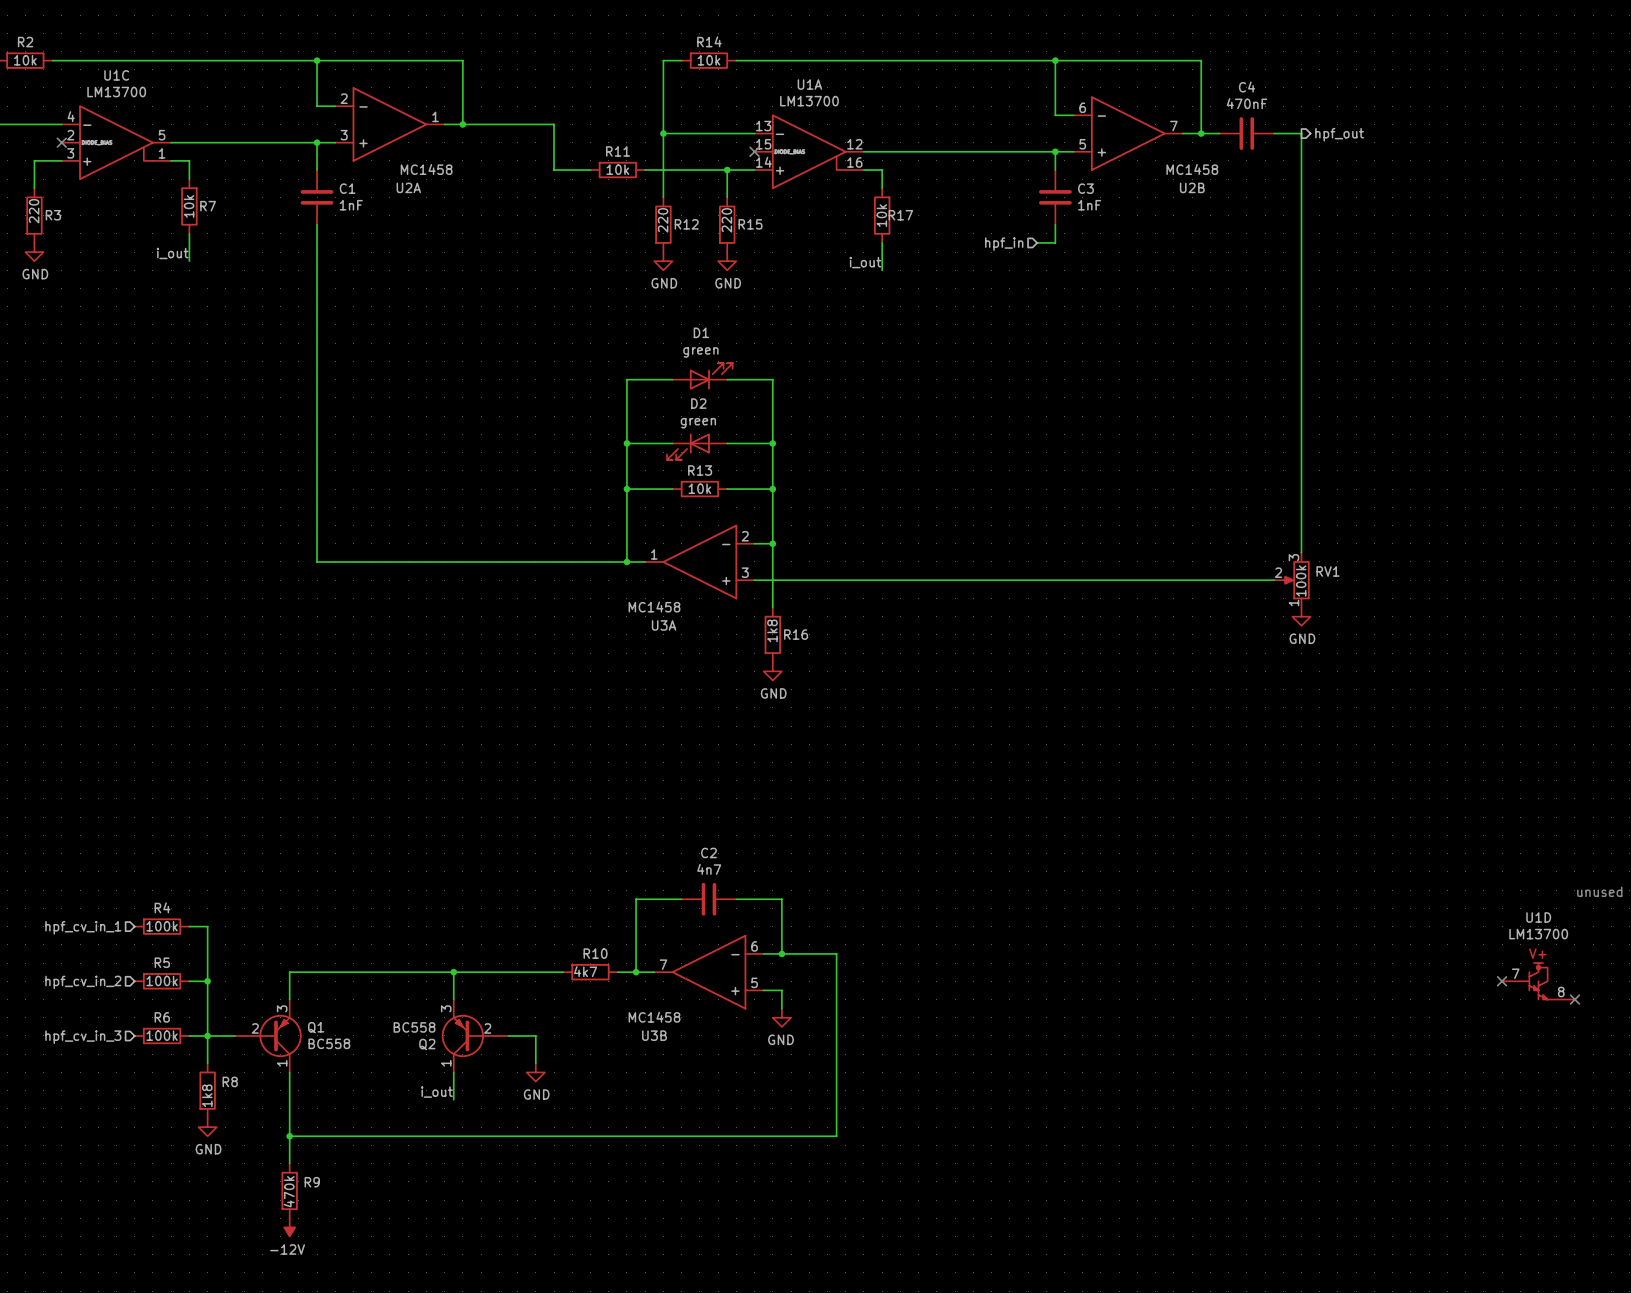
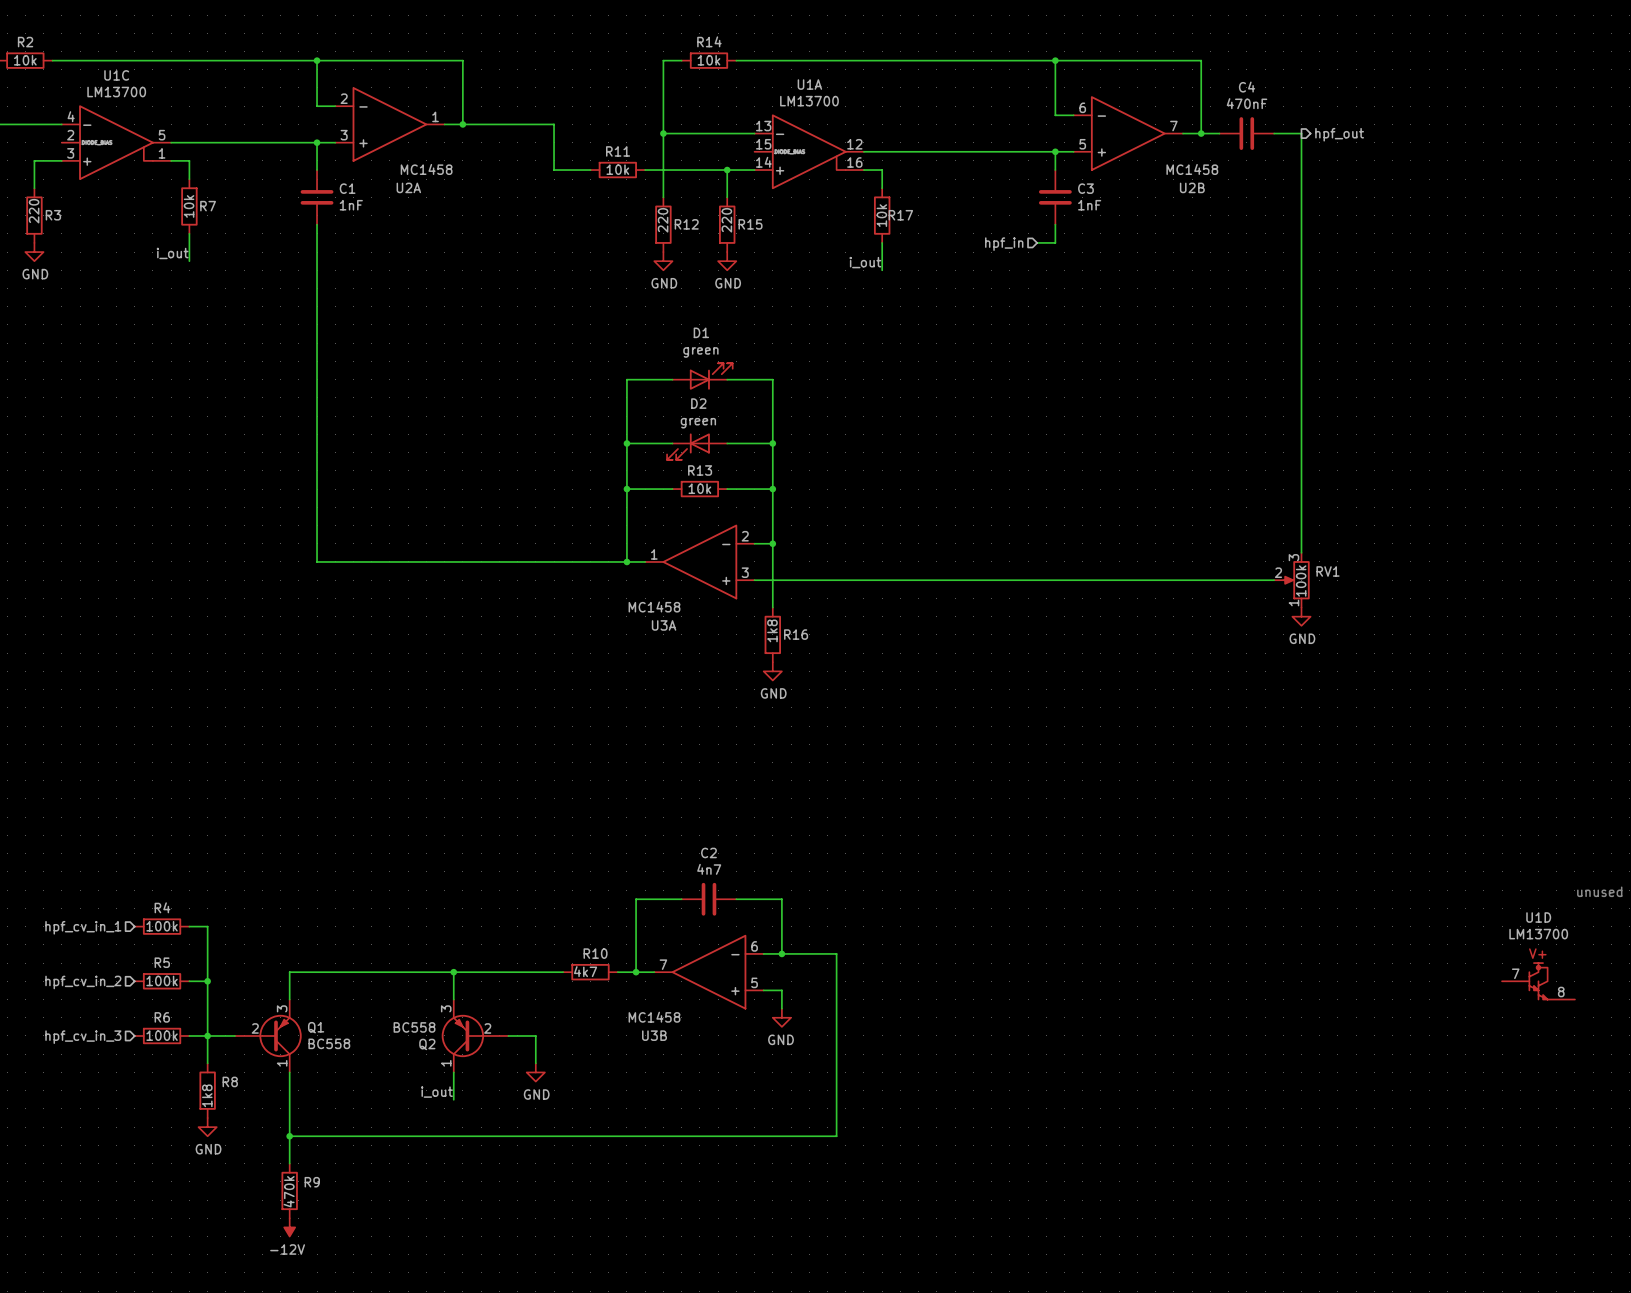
no-connect mark: (61, 142) -> none
no-connect mark: (754, 151) -> none
no-connect mark: (1502, 981) -> none
no-connect mark: (1574, 999) -> none

